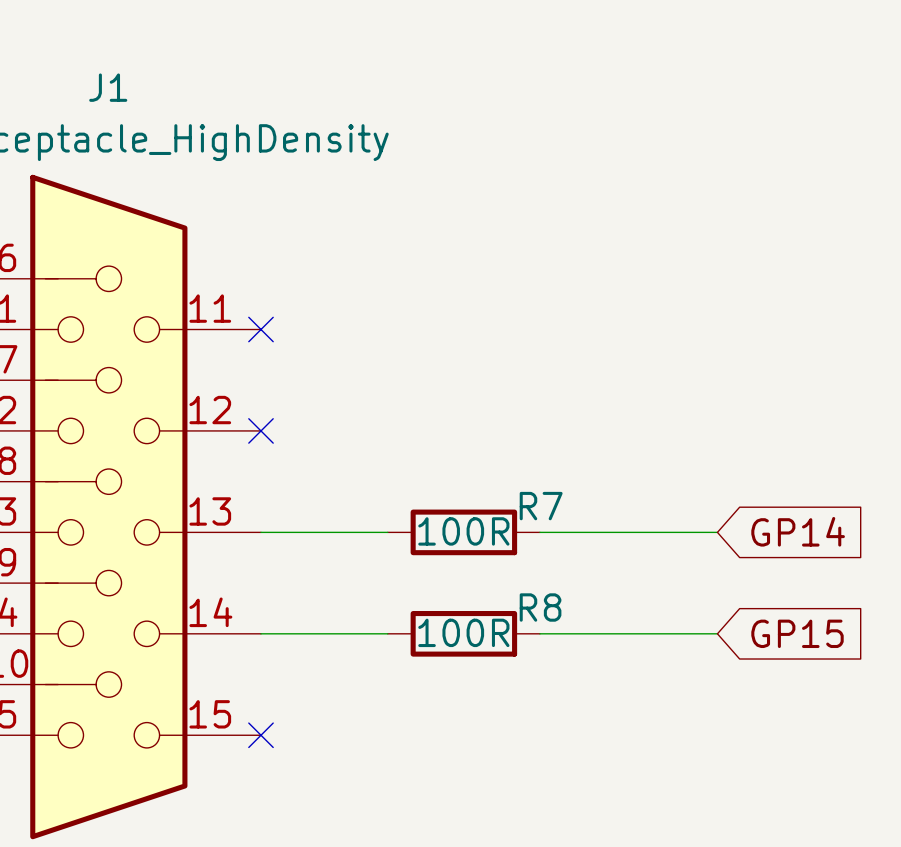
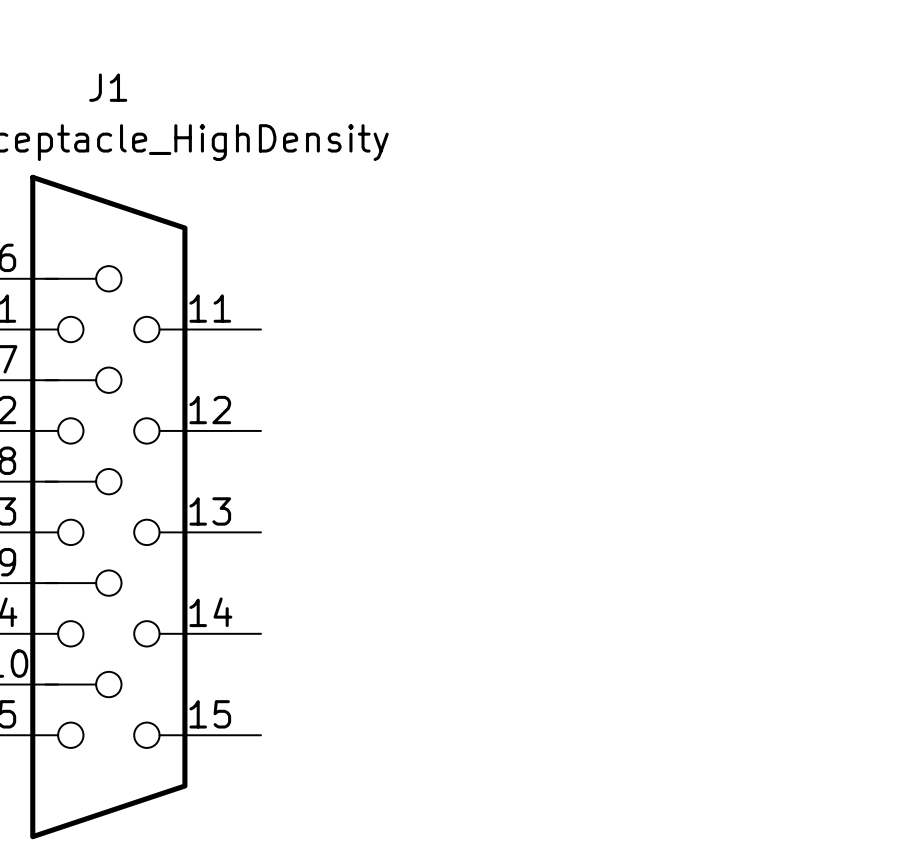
no-connect mark: (260, 329) -> none
no-connect mark: (260, 430) -> none
global label: GP14 (798, 531) -> none
wire: (260, 532) (387, 532) -> none
R7: 100R (463, 532) -> none
wire: (539, 532) (717, 532) -> none
wire: (260, 633) (387, 633) -> none
R8: 100R (463, 633) -> none
wire: (539, 633) (717, 633) -> none
global label: GP15 (797, 633) -> none
no-connect mark: (260, 735) -> none

